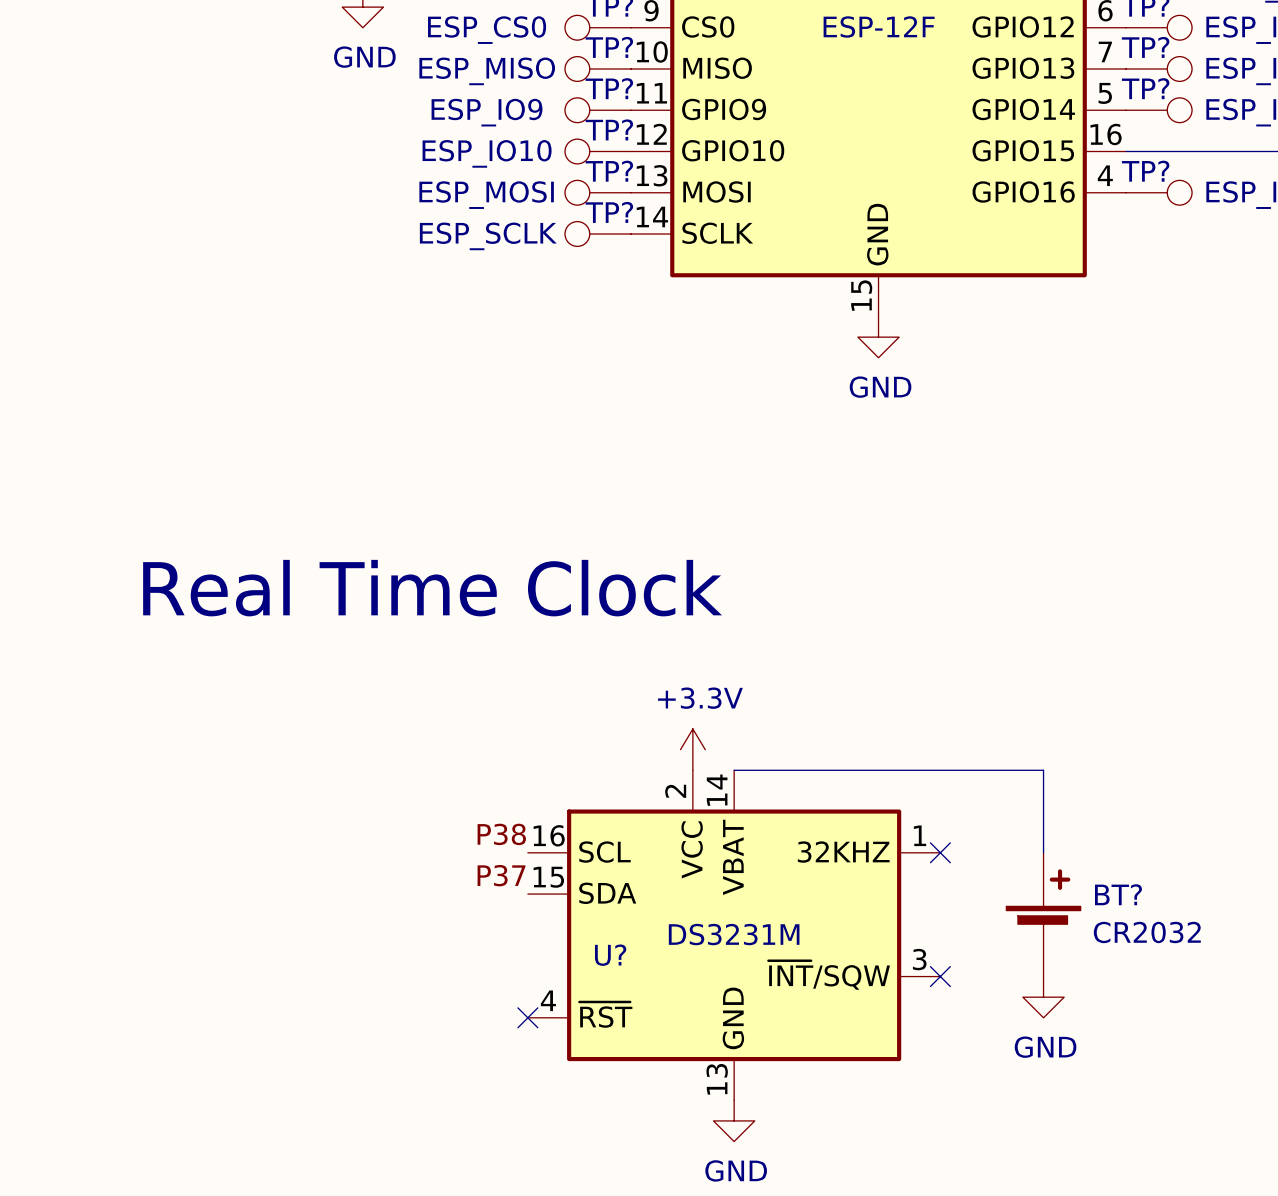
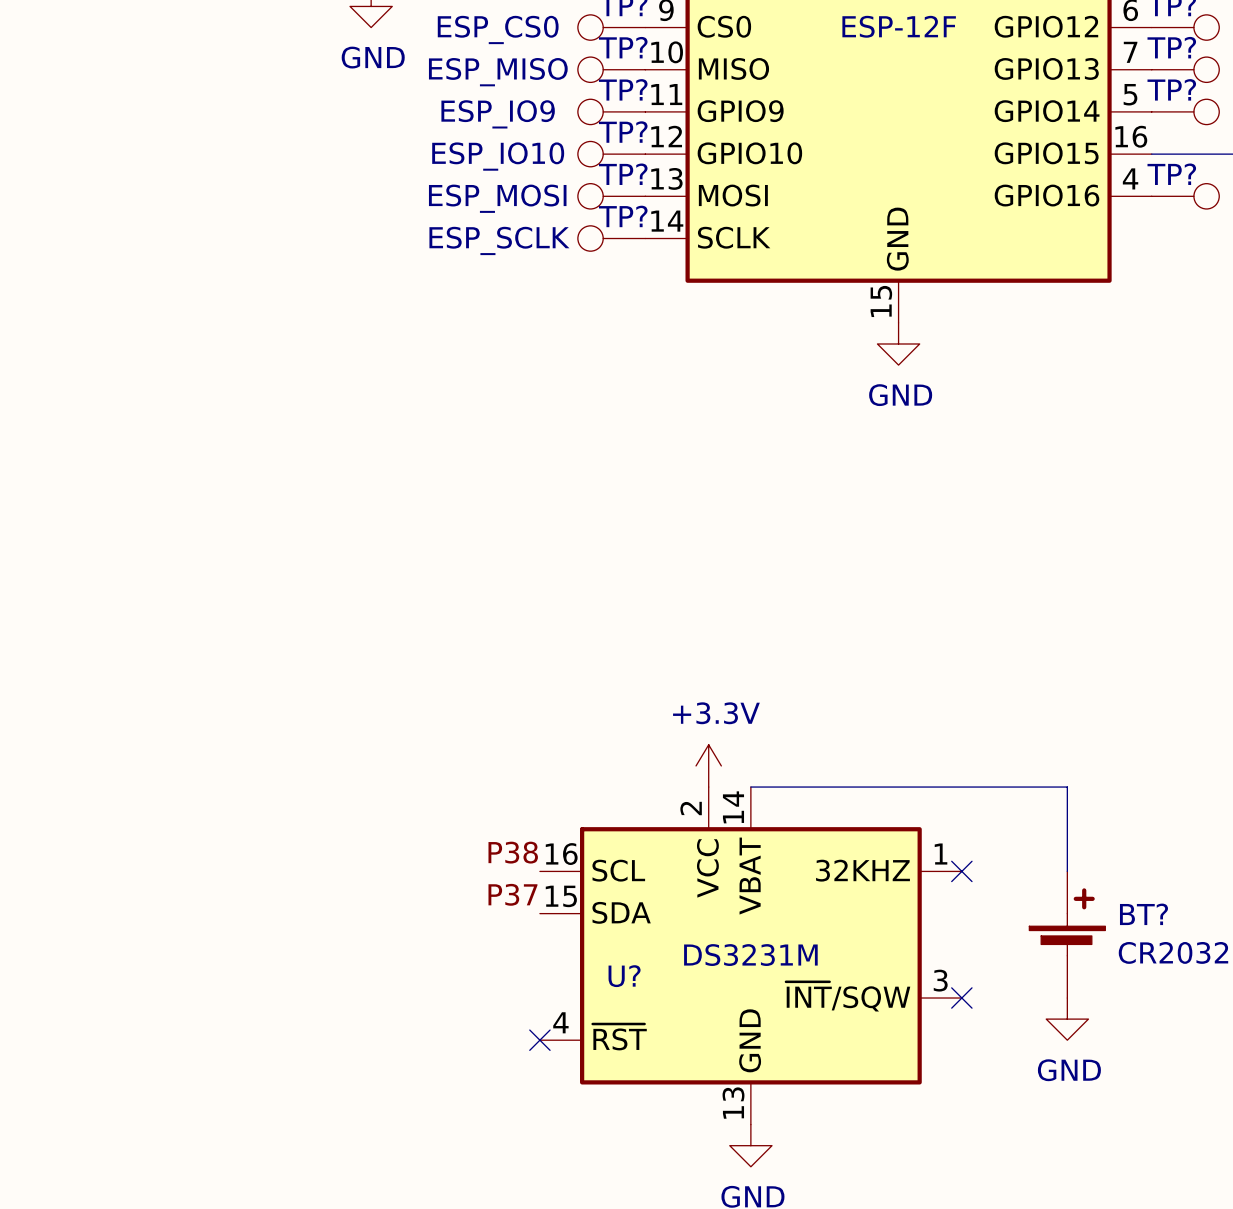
text: Real Time Clock (432, 588) -> none

